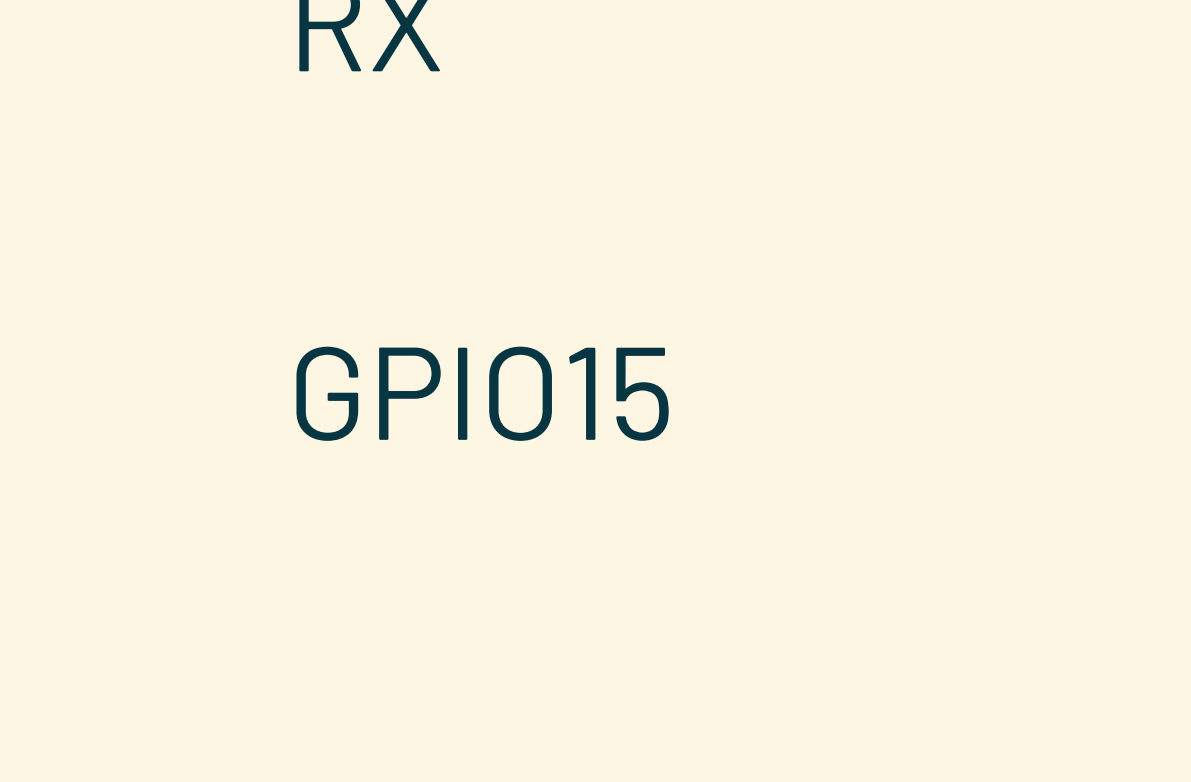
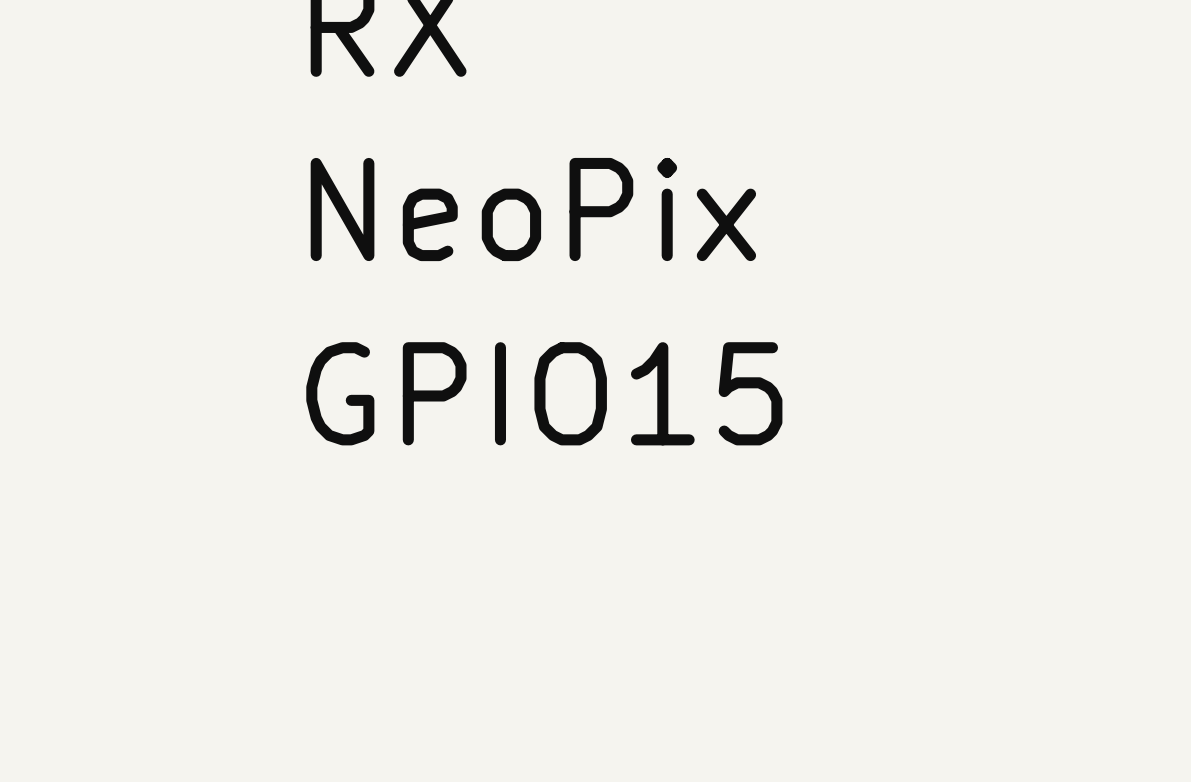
label: none -> NeoPix (533, 209)

